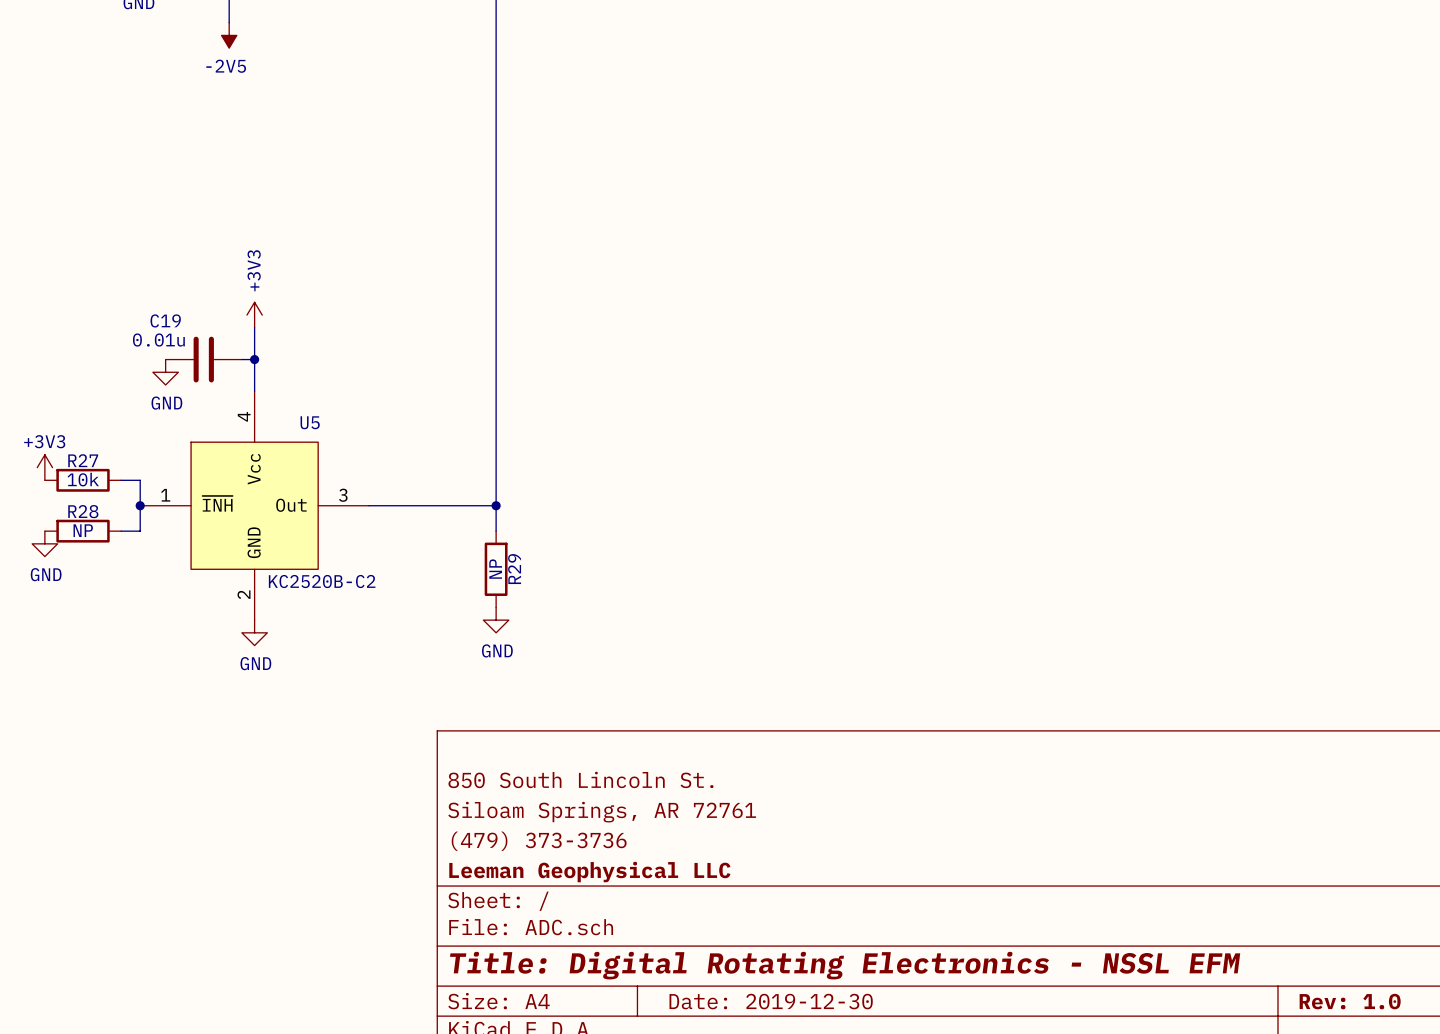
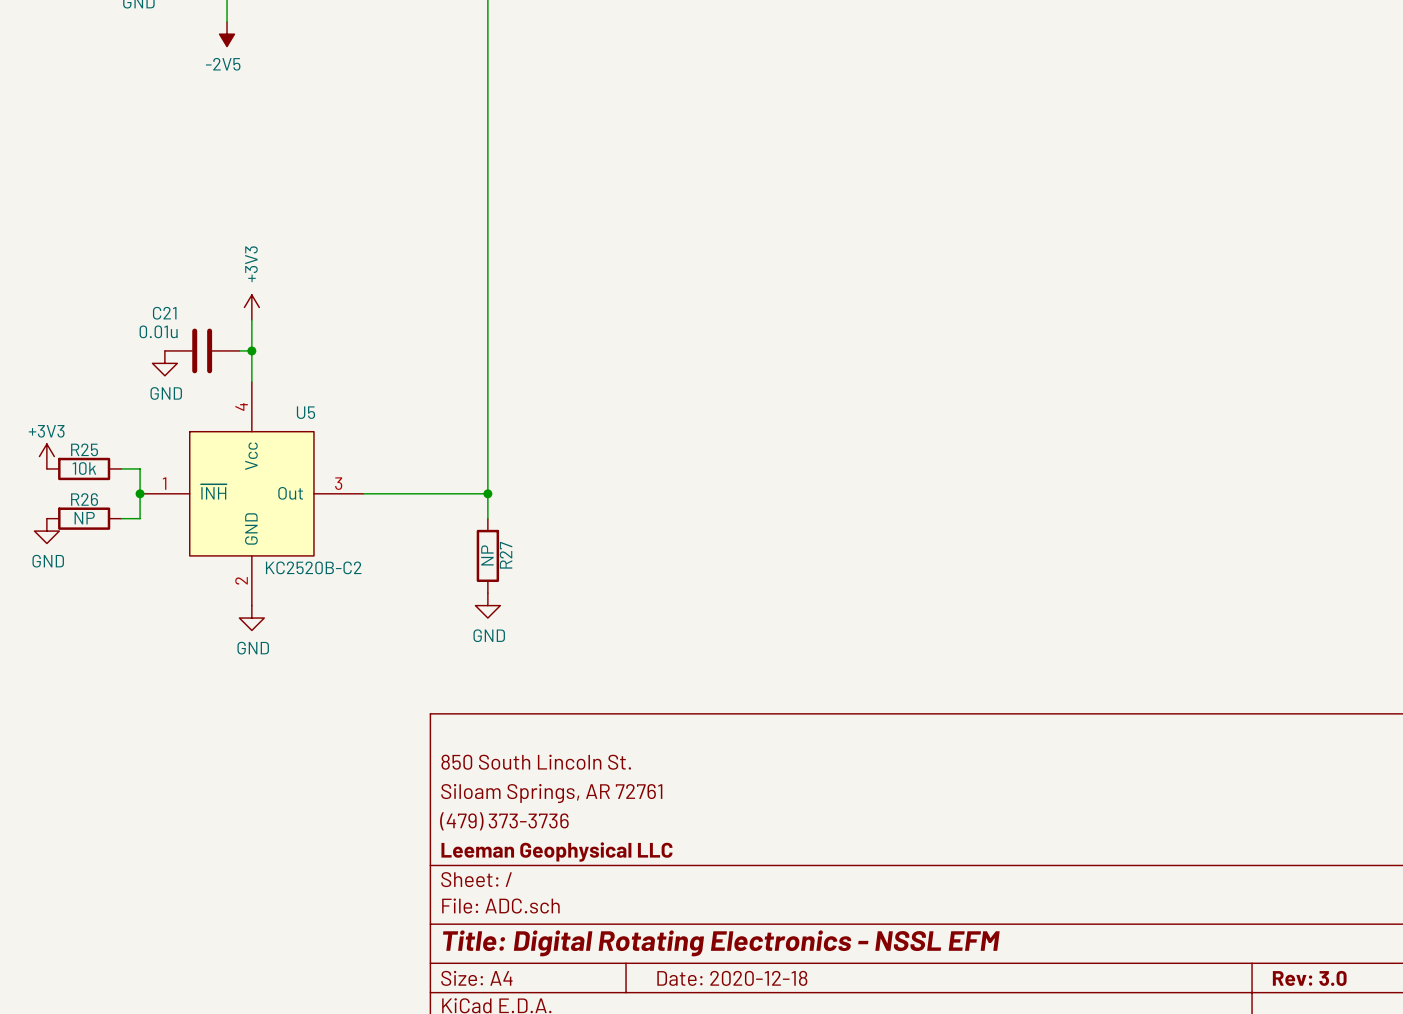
C19 name: C19 (165, 320) -> C21 (164, 313)
R27 name: R27 (83, 460) -> R25 (84, 449)
R28 name: R28 (83, 511) -> R26 (84, 499)
R29 name: R29 (514, 569) -> R27 (505, 555)
title block: Date: 2019-12-30 (771, 1001) -> Date: 2020-12-18 (732, 978)
title block: Rev: 1.0 (1350, 1001) -> Rev: 3.0 (1309, 978)

